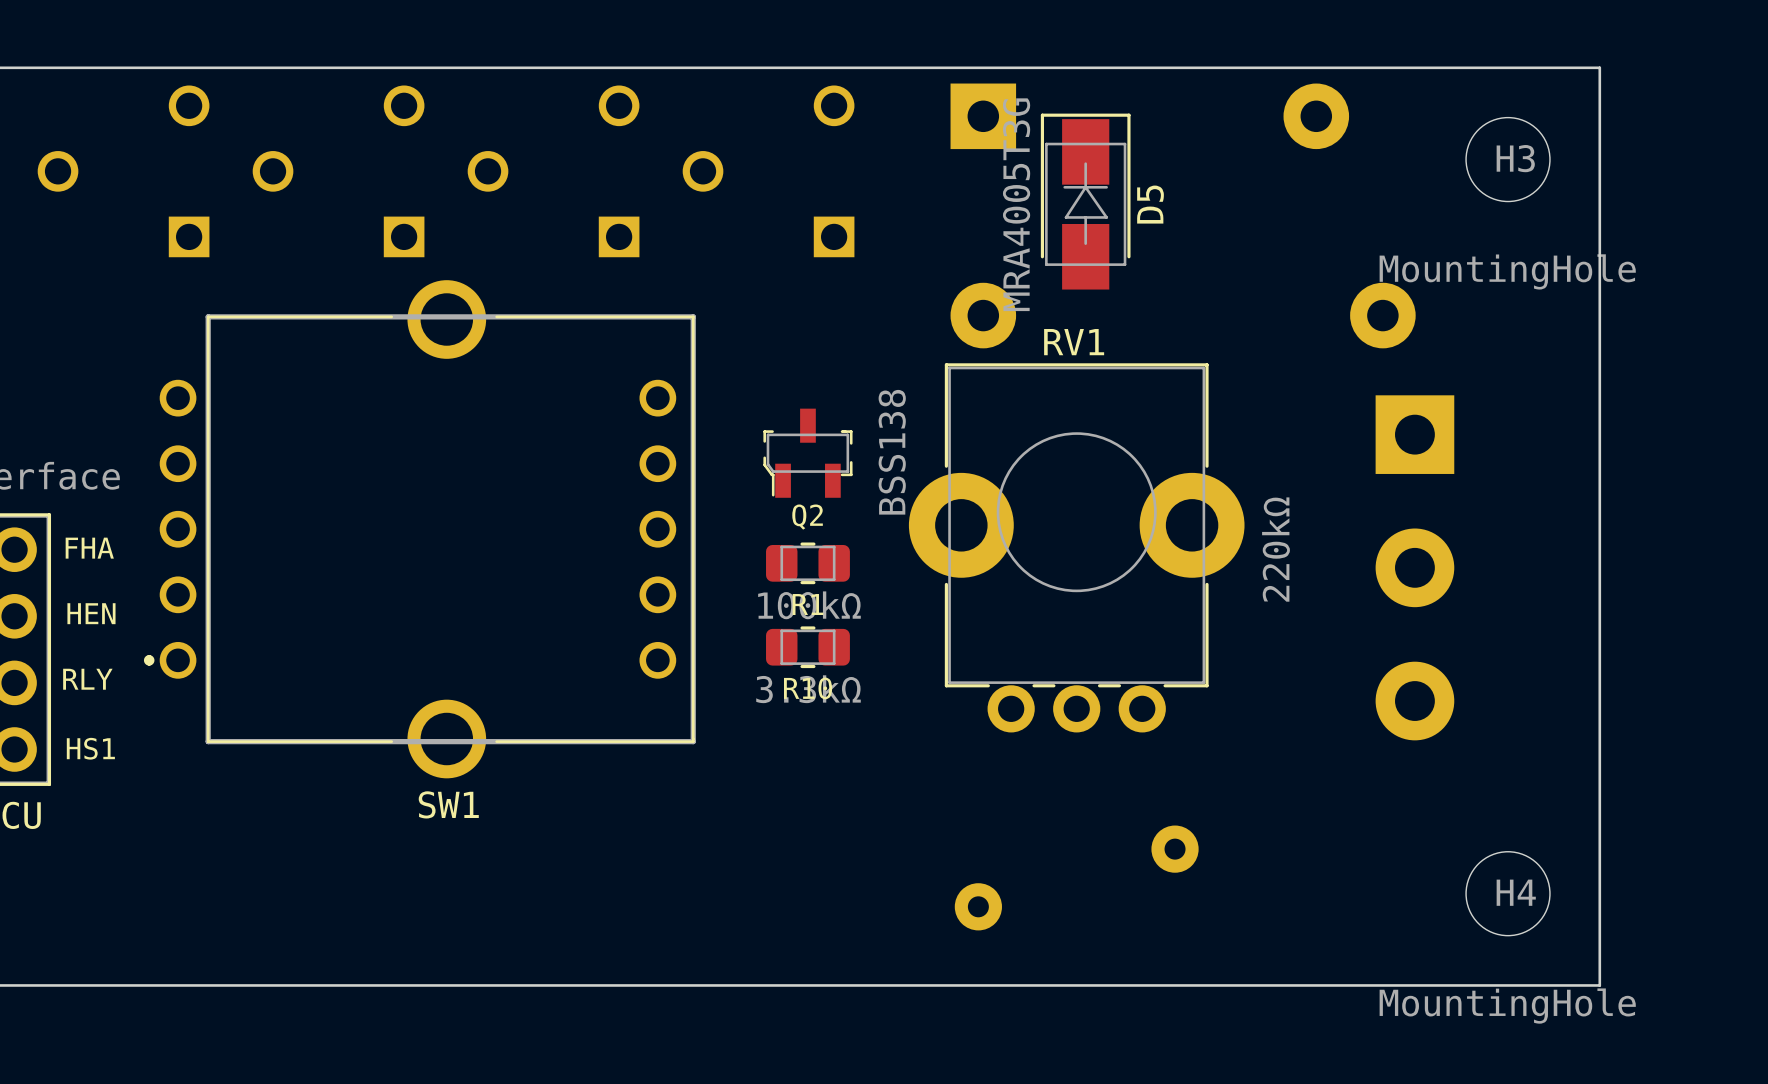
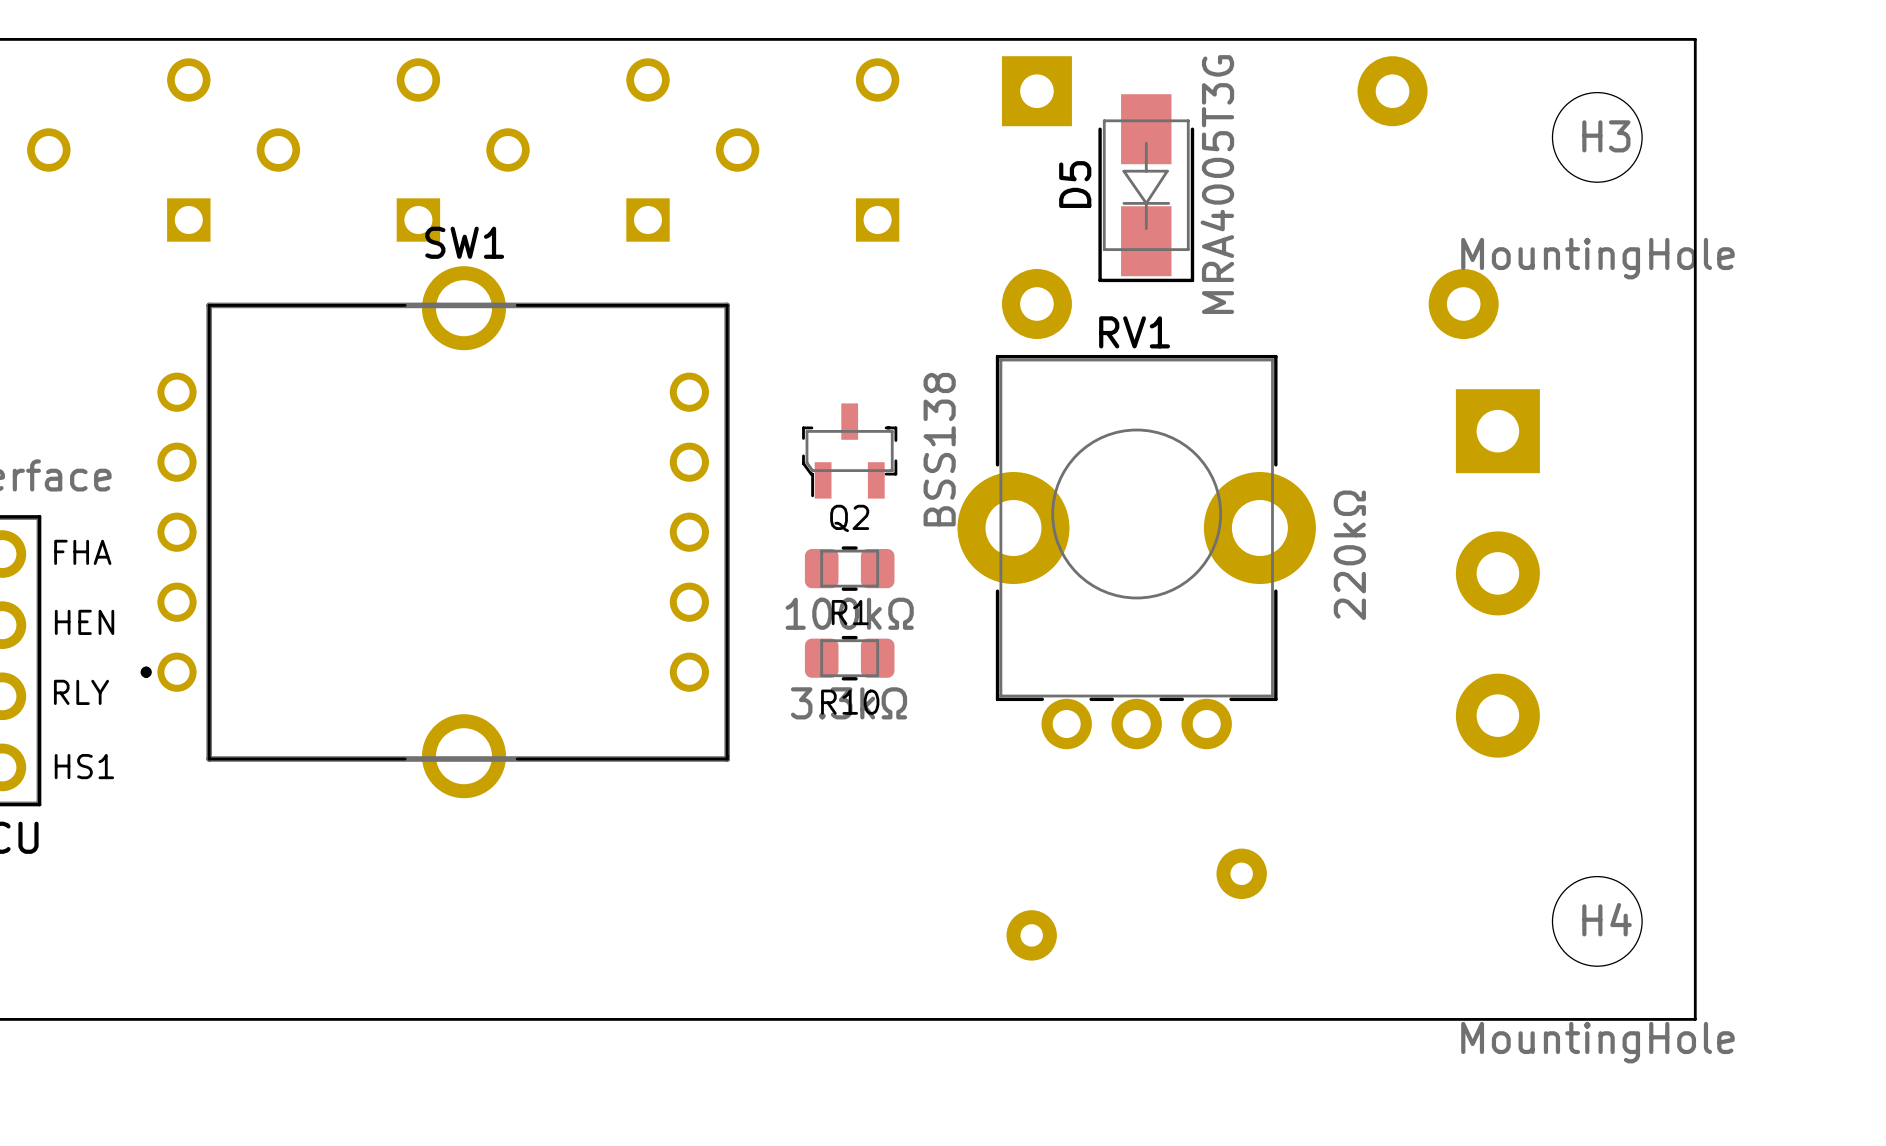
D5 rotation: 0° (1085, 201) -> 180° (1146, 188)
SW1 name position: SW1 (448, 804) -> SW1 (464, 242)

